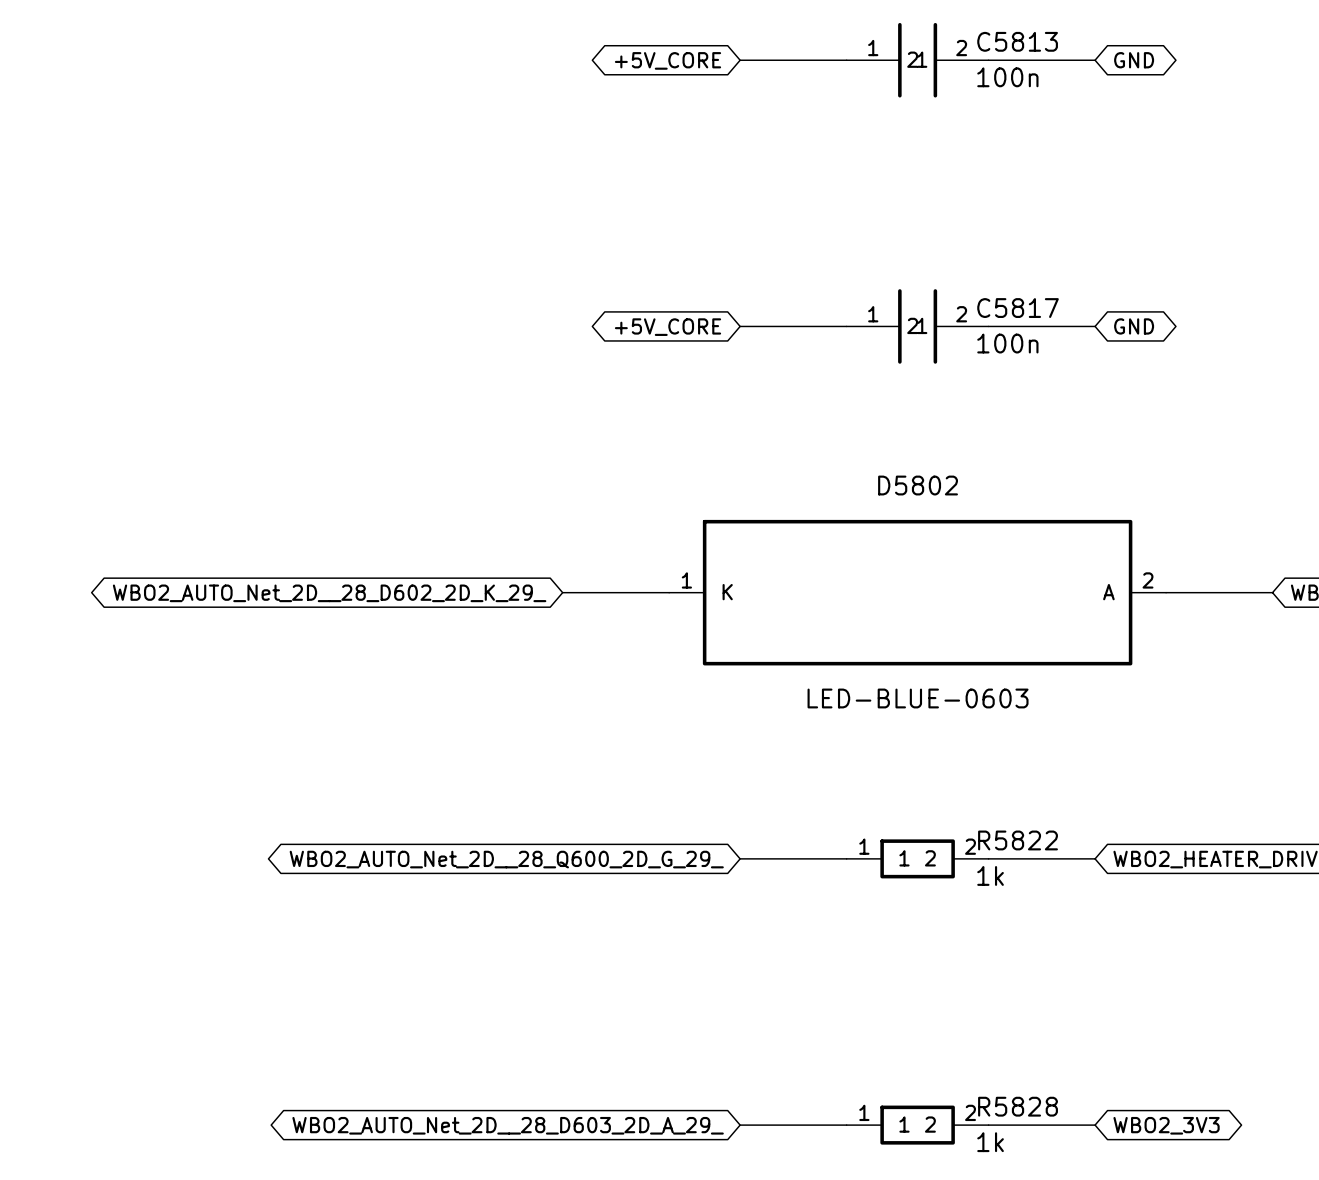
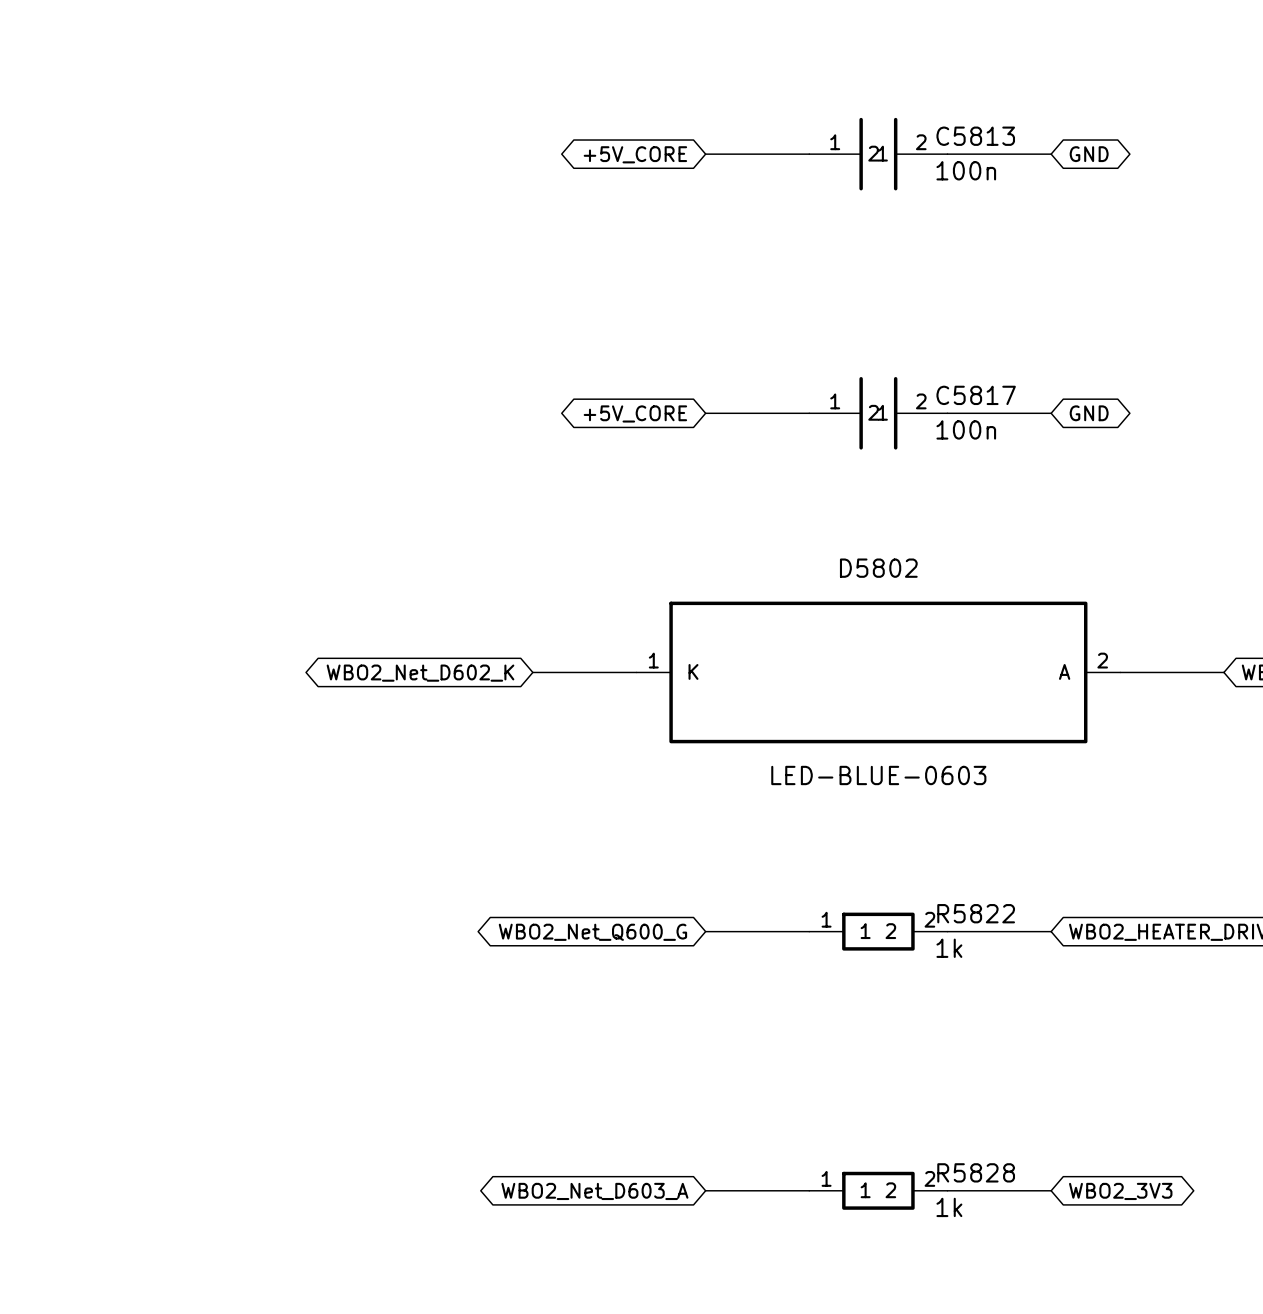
global label: WBO2_AUTO_Net_2D__28_D602_2D_K_29_ (329, 593) -> WBO2_Net_D602_K (420, 673)
global label: WBO2_AUTO_Net_2D__28_Q600_2D_G_29_ (506, 859) -> WBO2_Net_Q600_G (592, 932)
global label: WBO2_AUTO_Net_2D__28_D603_2D_A_29_ (508, 1125) -> WBO2_Net_D603_A (594, 1191)

